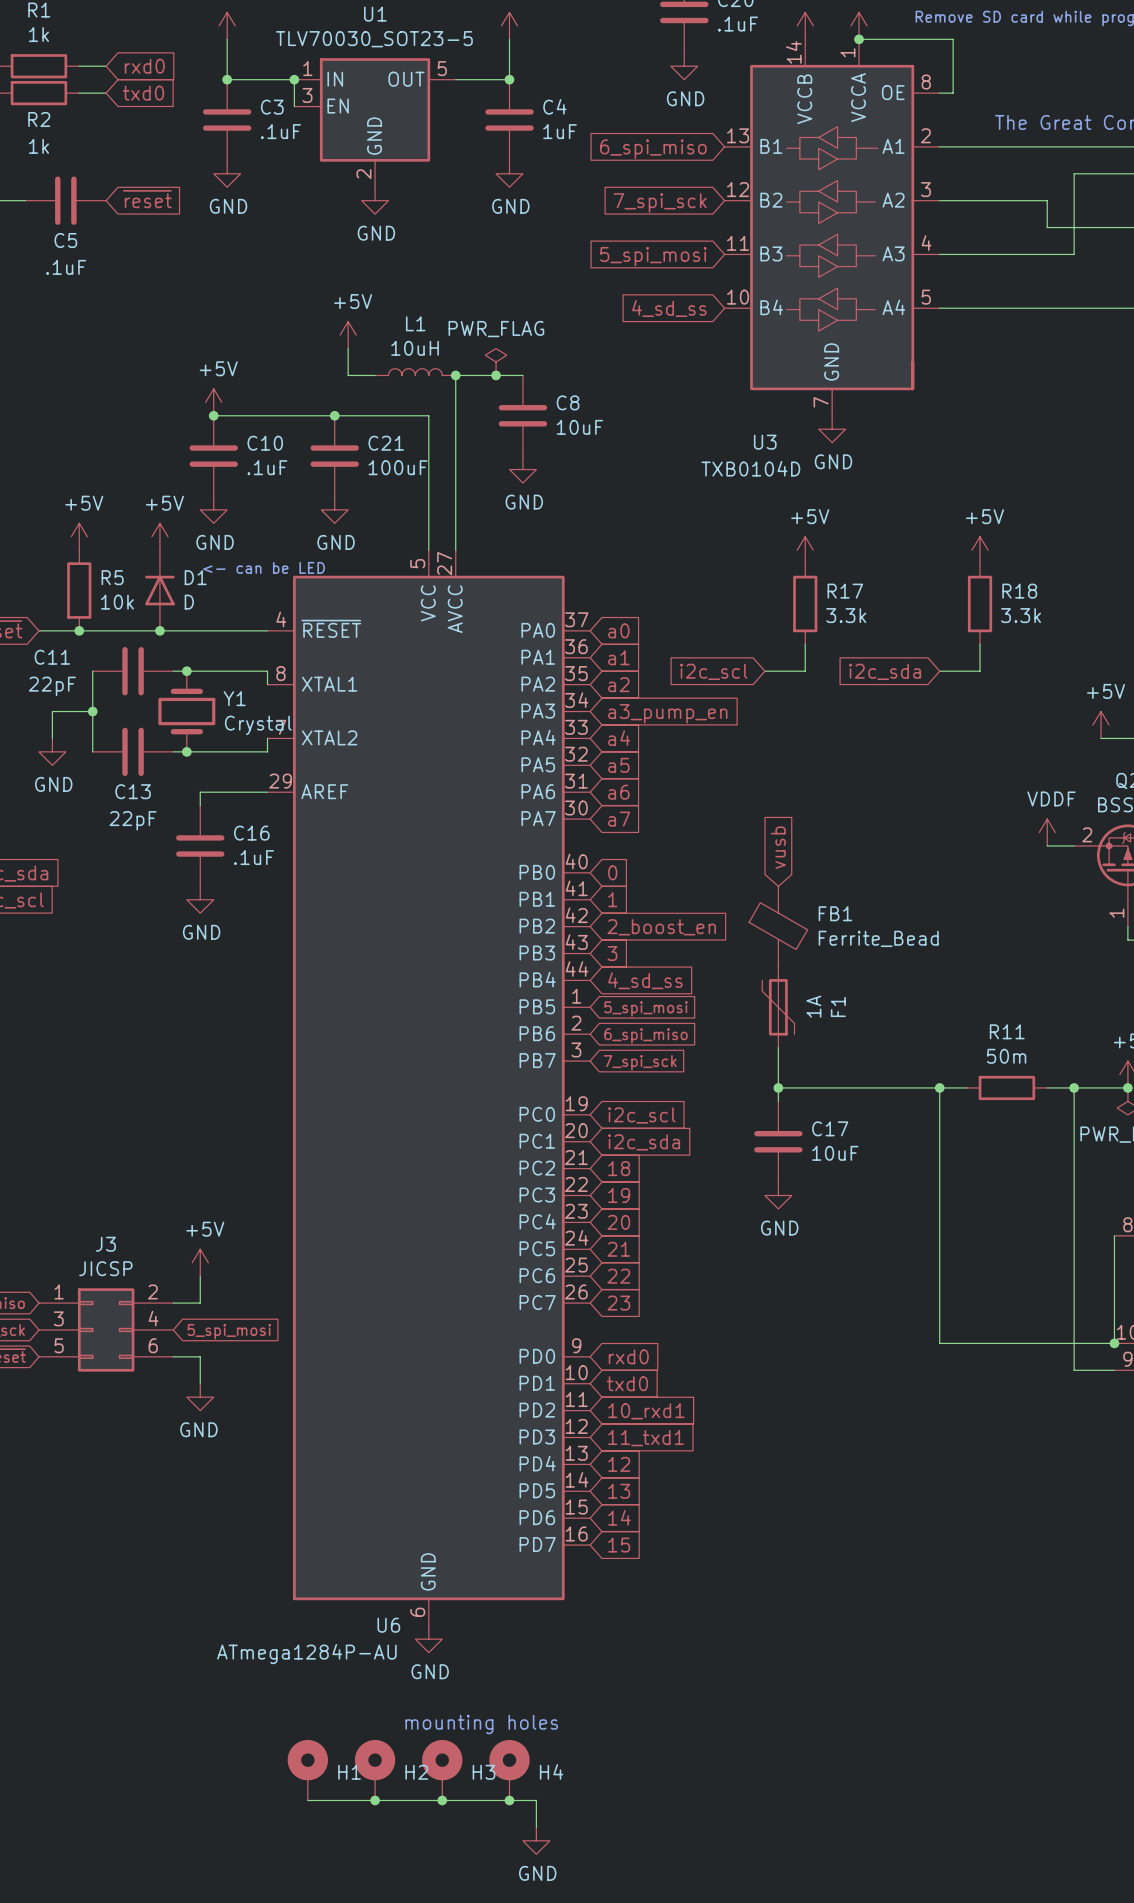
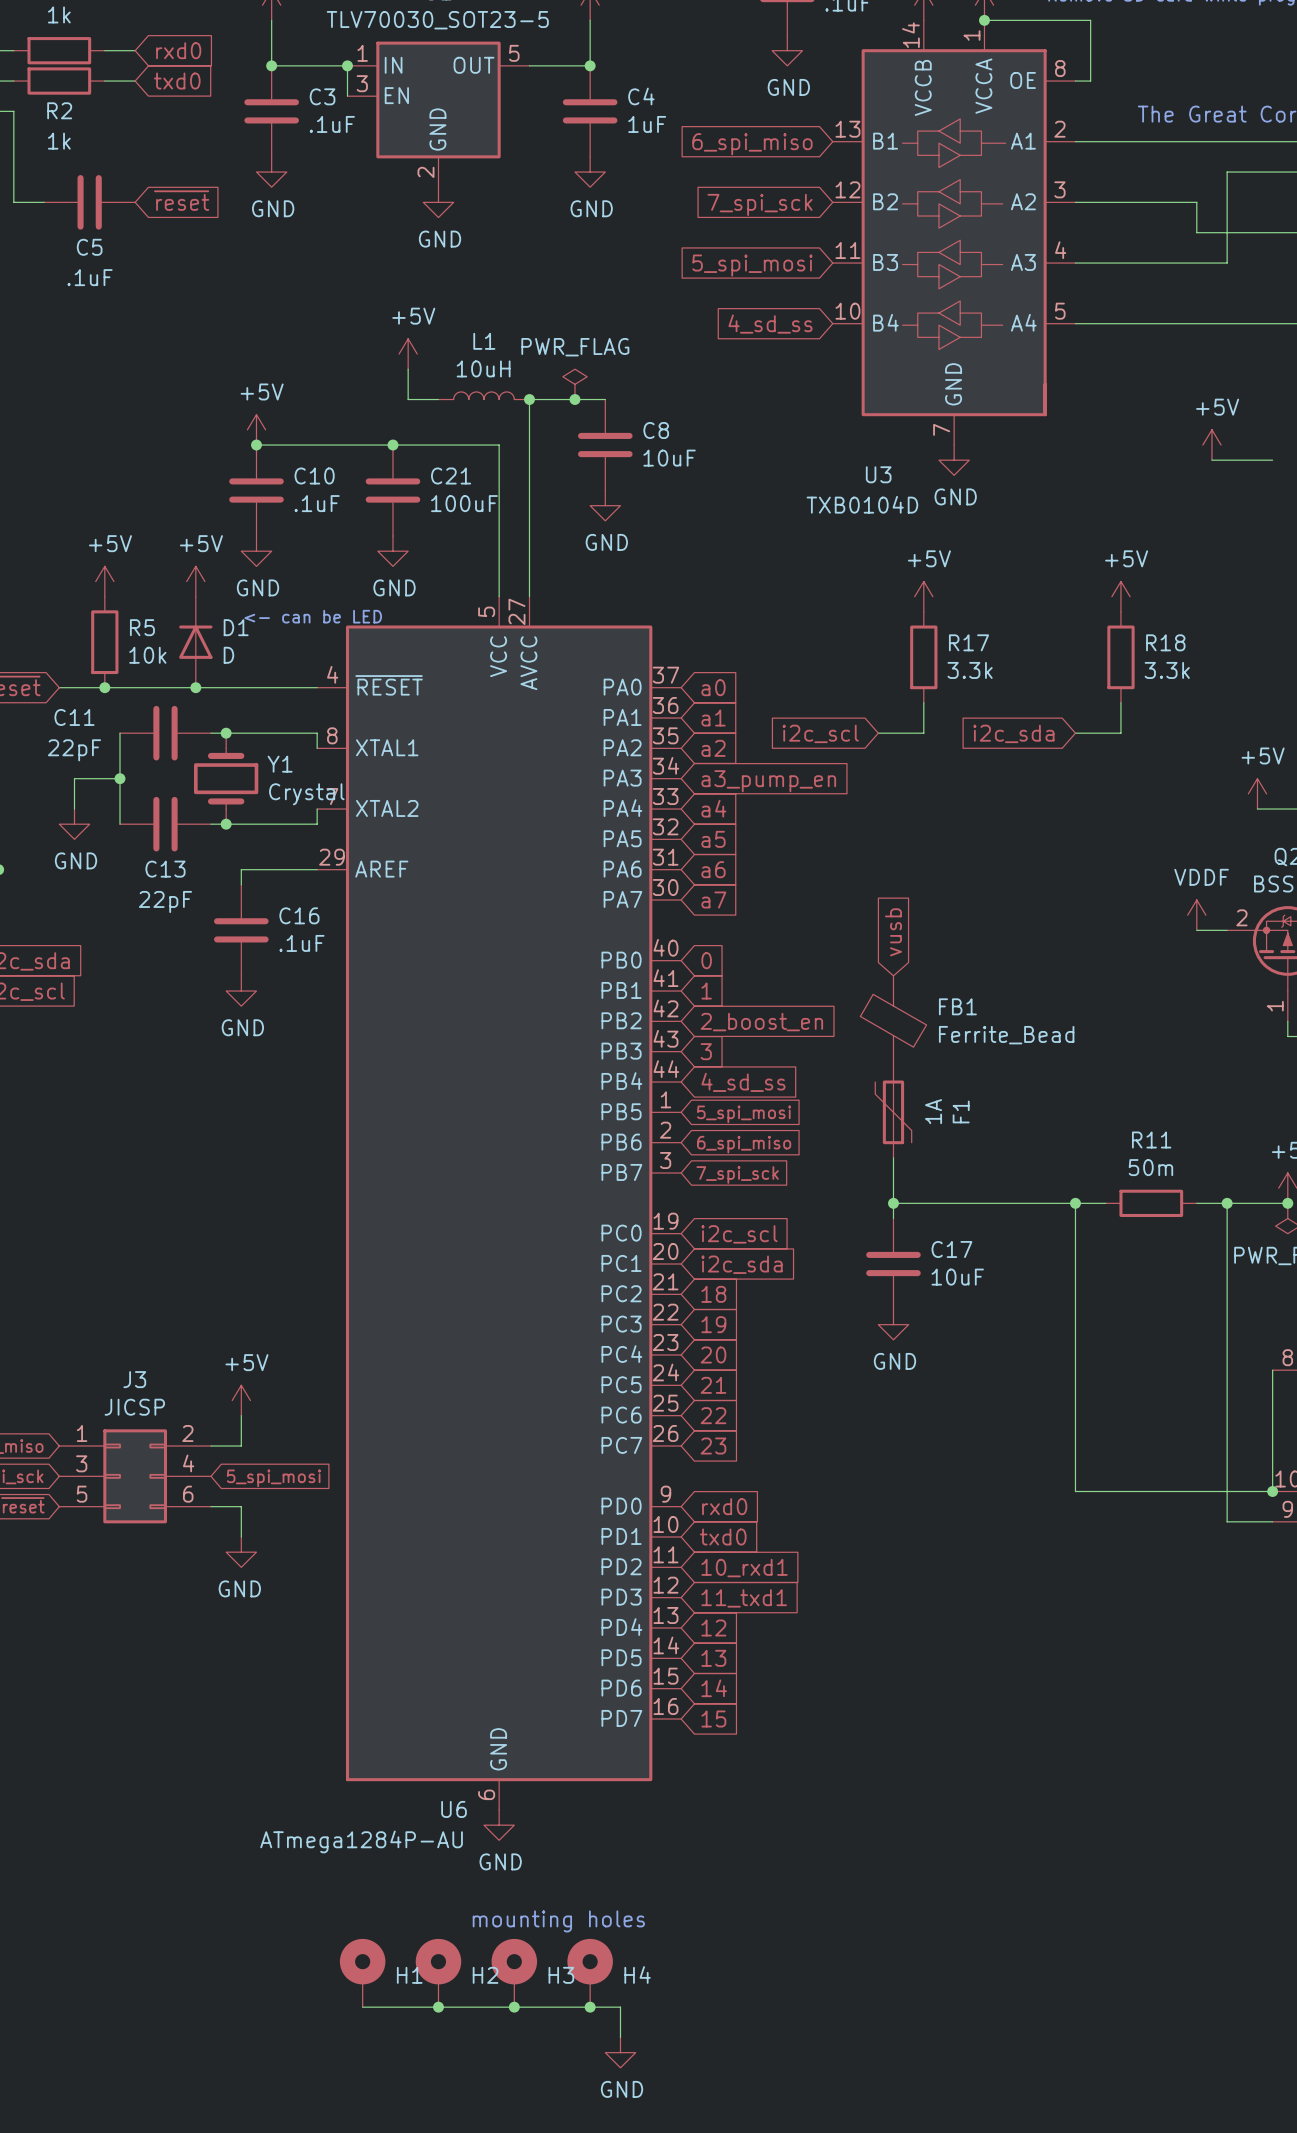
power symbol: none -> +5V (1211, 445)
wire: none -> (1211, 460) (1272, 460)

